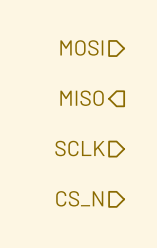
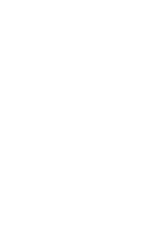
hierarchical label: MOSI (81, 47) -> none
hierarchical label: MISO (82, 98) -> none
hierarchical label: SCLK (80, 148) -> none
hierarchical label: CS_N (79, 198) -> none

